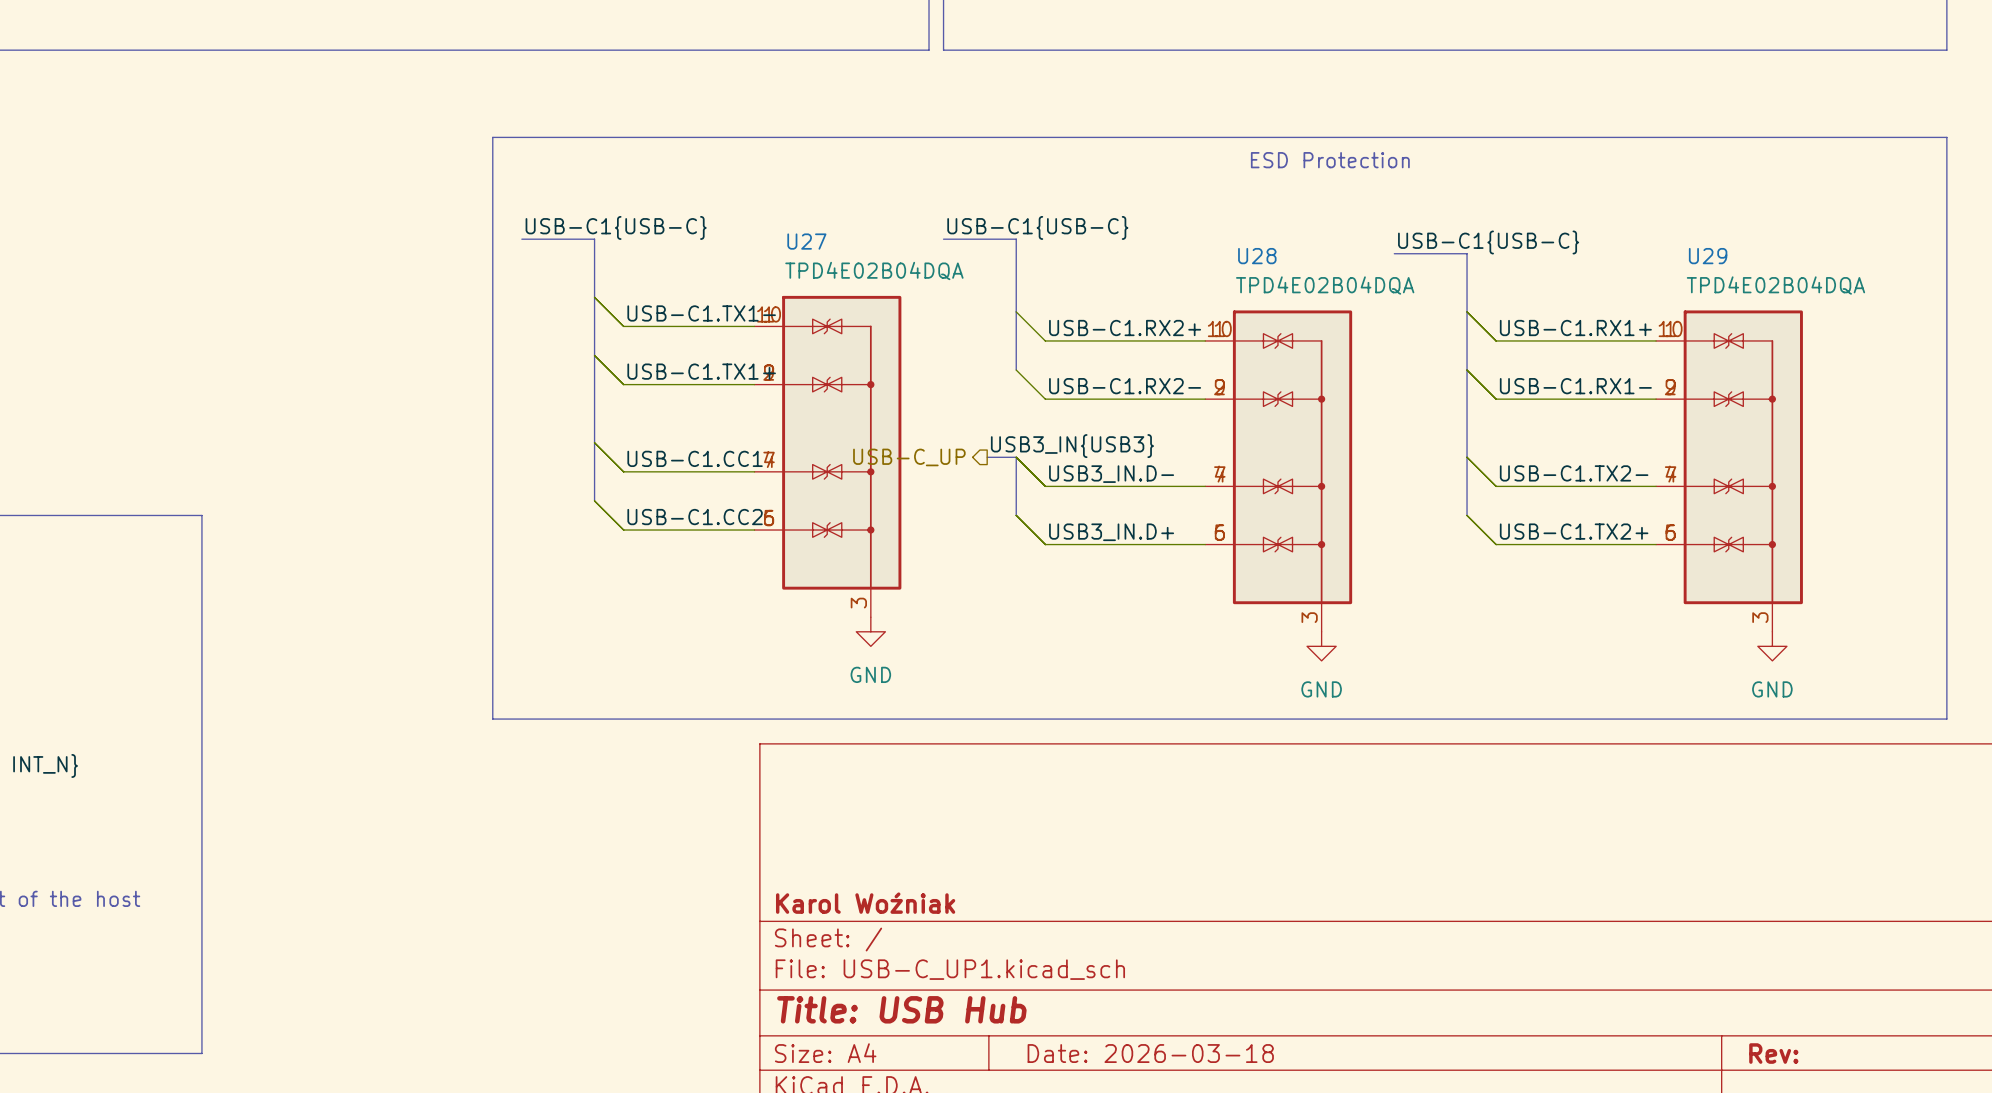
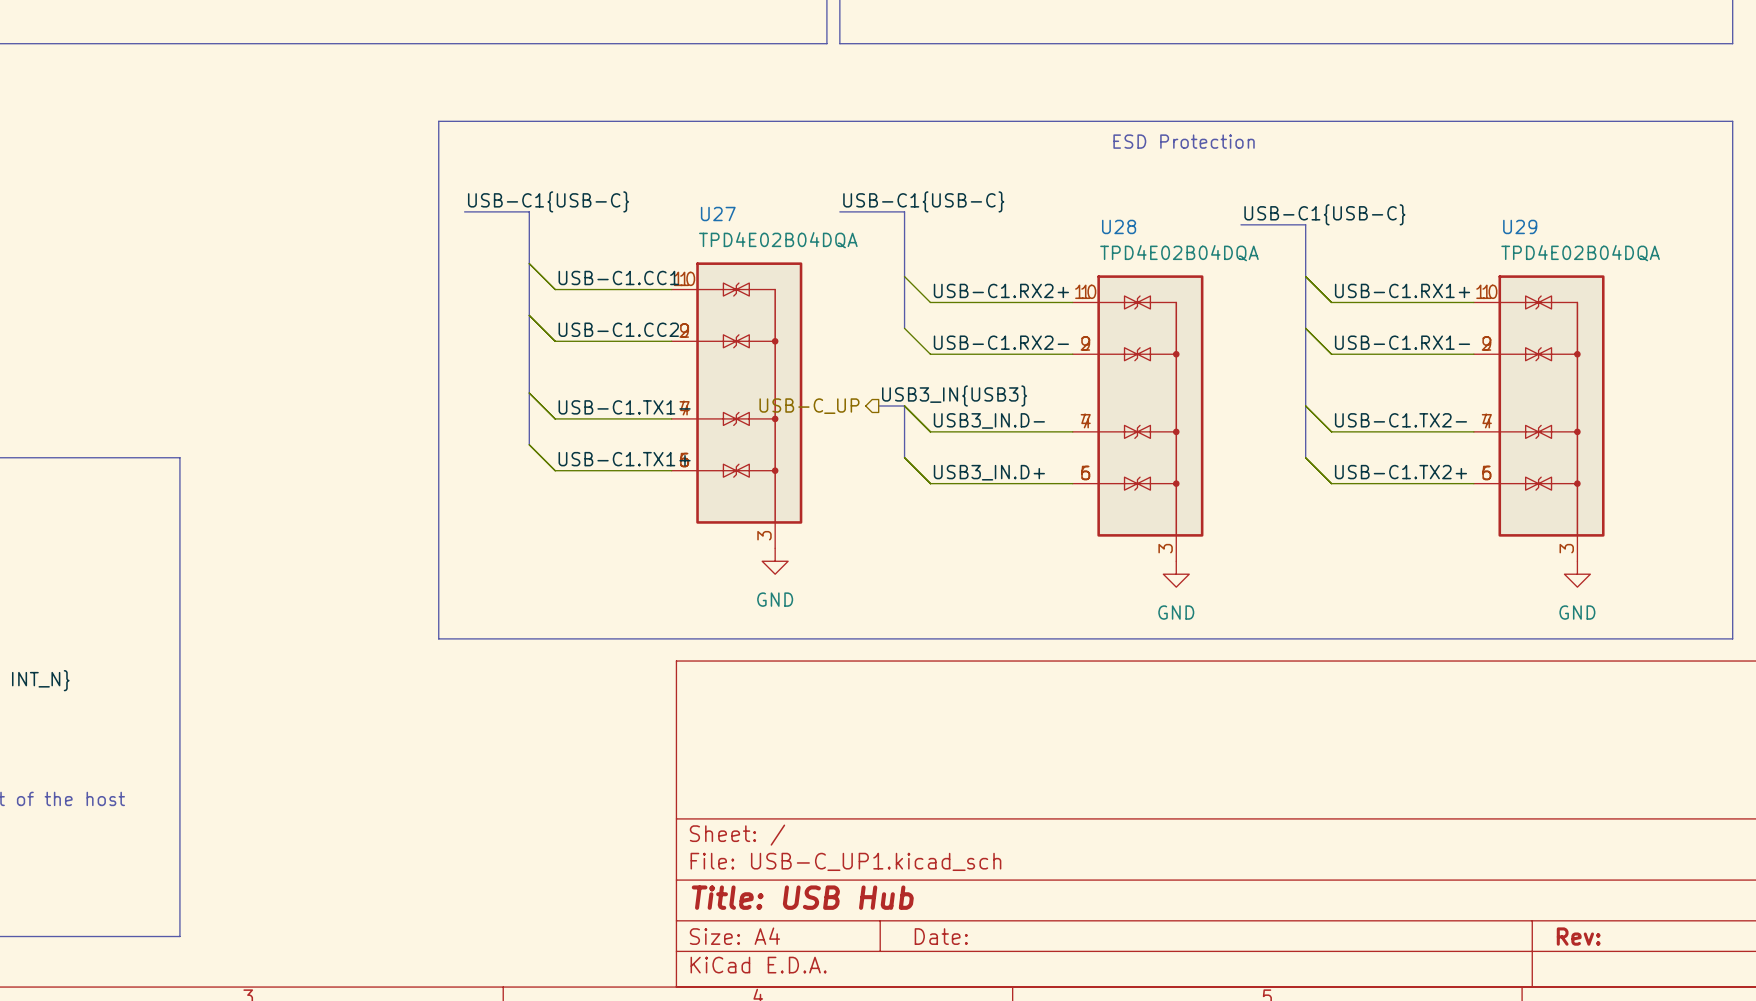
label: USB-C1.TX1- (701, 313) -> USB-C1.CC1 (618, 277)
label: USB-C1.TX1+ (701, 371) -> USB-C1.CC2 (618, 329)
label: USB-C1.CC1 (695, 458) -> USB-C1.TX1- (624, 407)
label: USB-C1.CC2 (695, 517) -> USB-C1.TX1+ (624, 459)
title block: Karol Woźniak (865, 903) -> none
title block: Date: 2026-03-18 (1150, 1053) -> Date: (941, 936)

